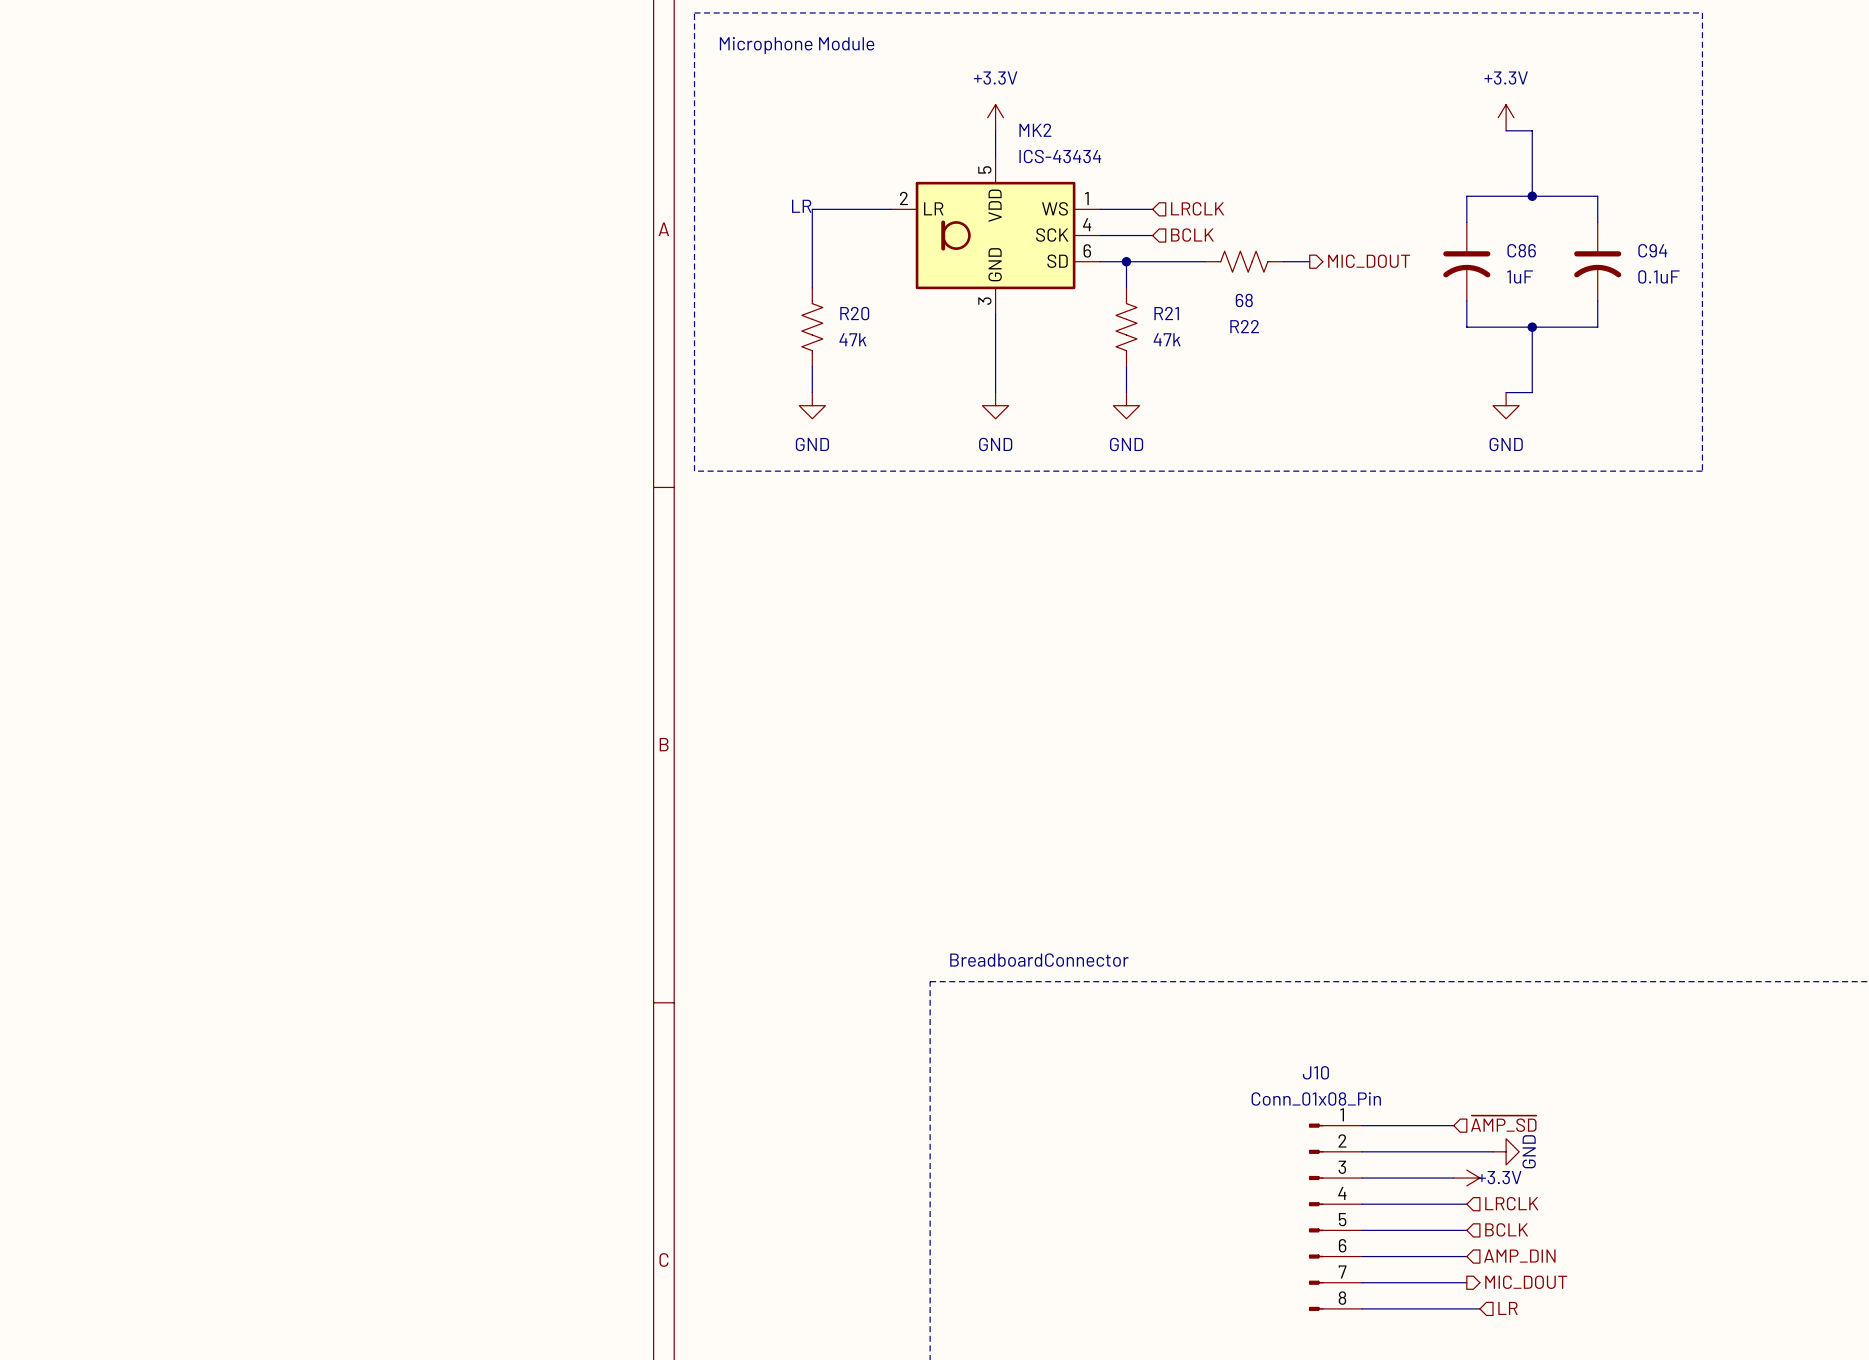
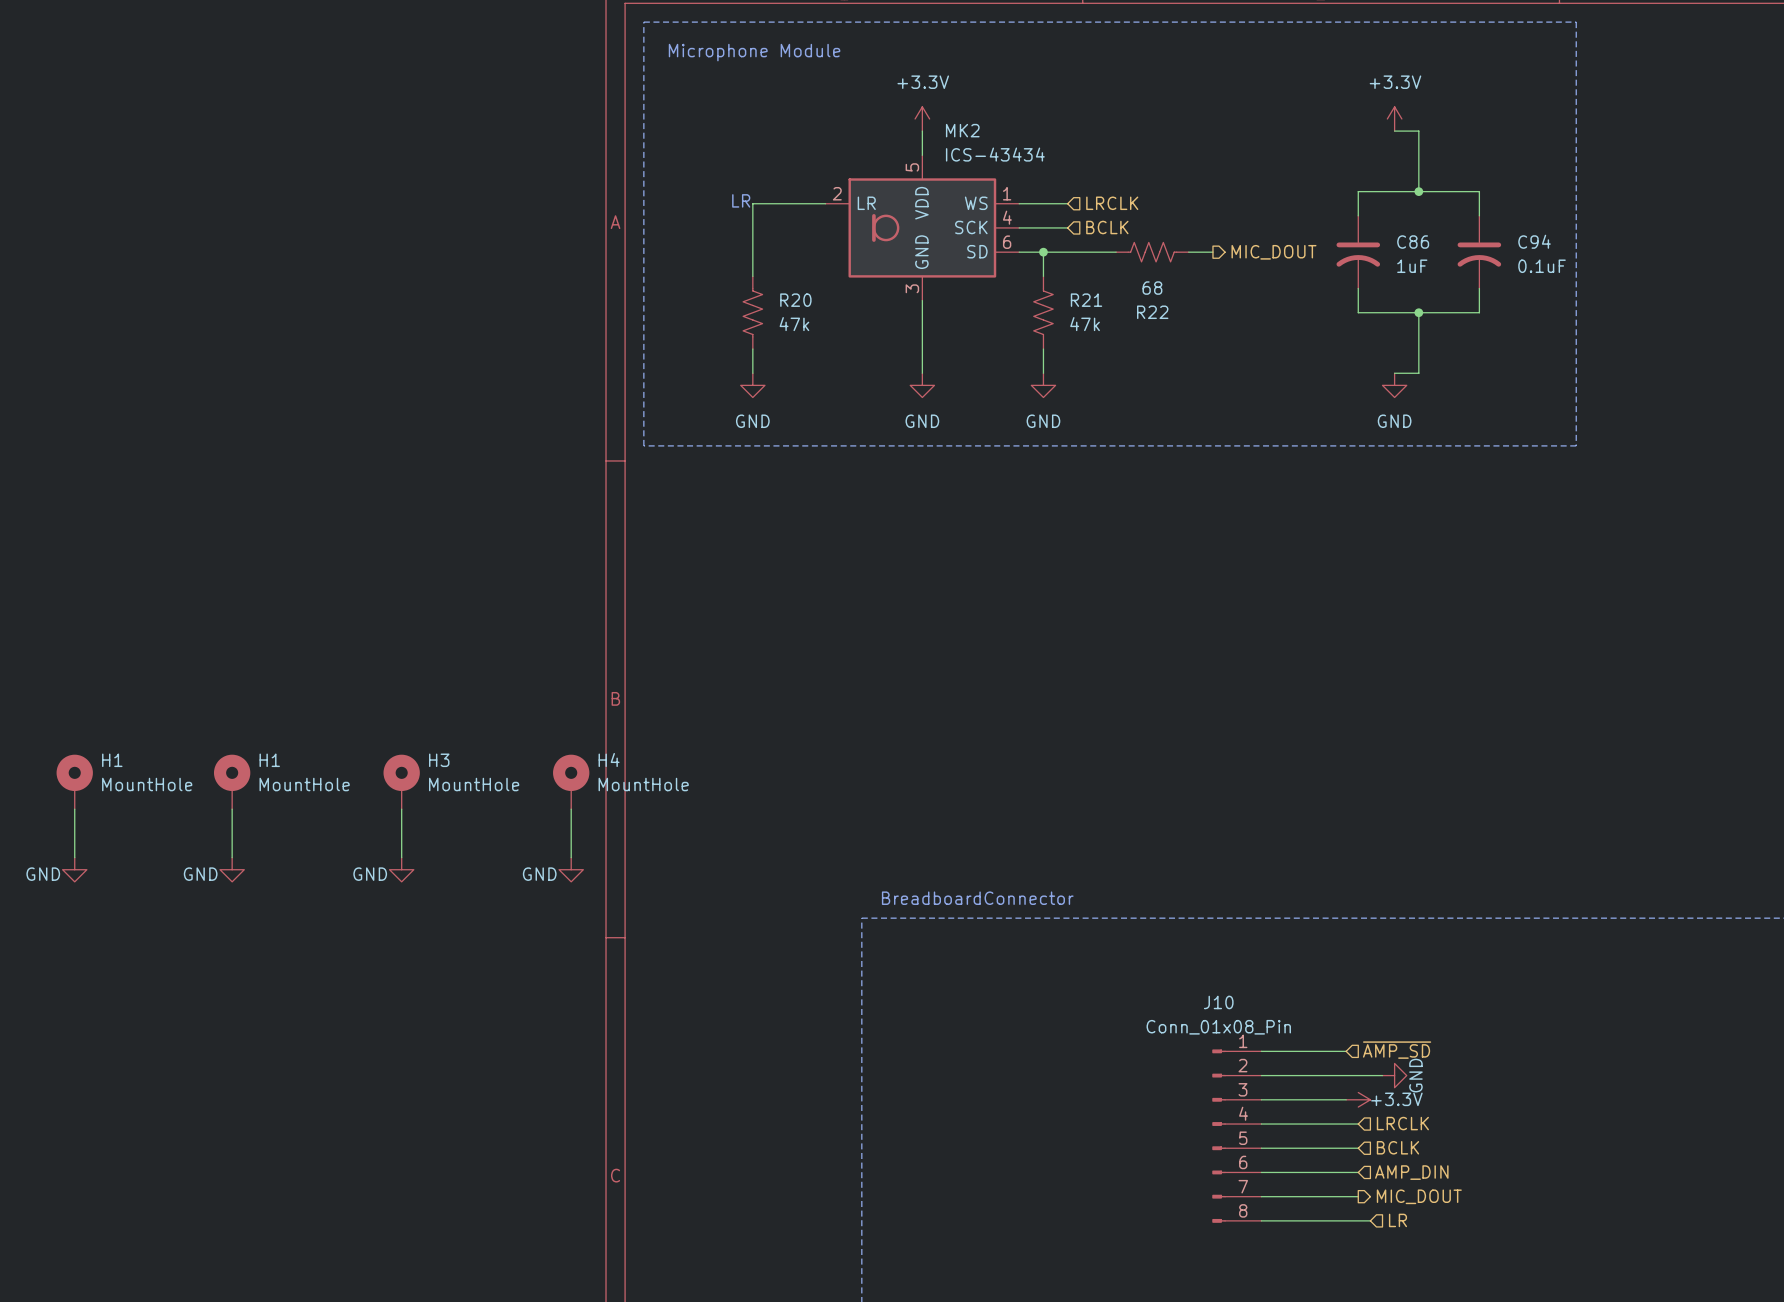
H1: none -> MountHole (74, 781)
H1: none -> MountHole (232, 781)
H3: none -> MountHole (401, 781)
H4: none -> MountHole (571, 781)
wire: none -> (74, 809) (74, 857)
wire: none -> (232, 809) (232, 857)
wire: none -> (401, 809) (401, 857)
wire: none -> (571, 809) (571, 857)
power symbol: none -> GND (74, 869)
power symbol: none -> GND (232, 869)
power symbol: none -> GND (401, 869)
power symbol: none -> GND (571, 869)

